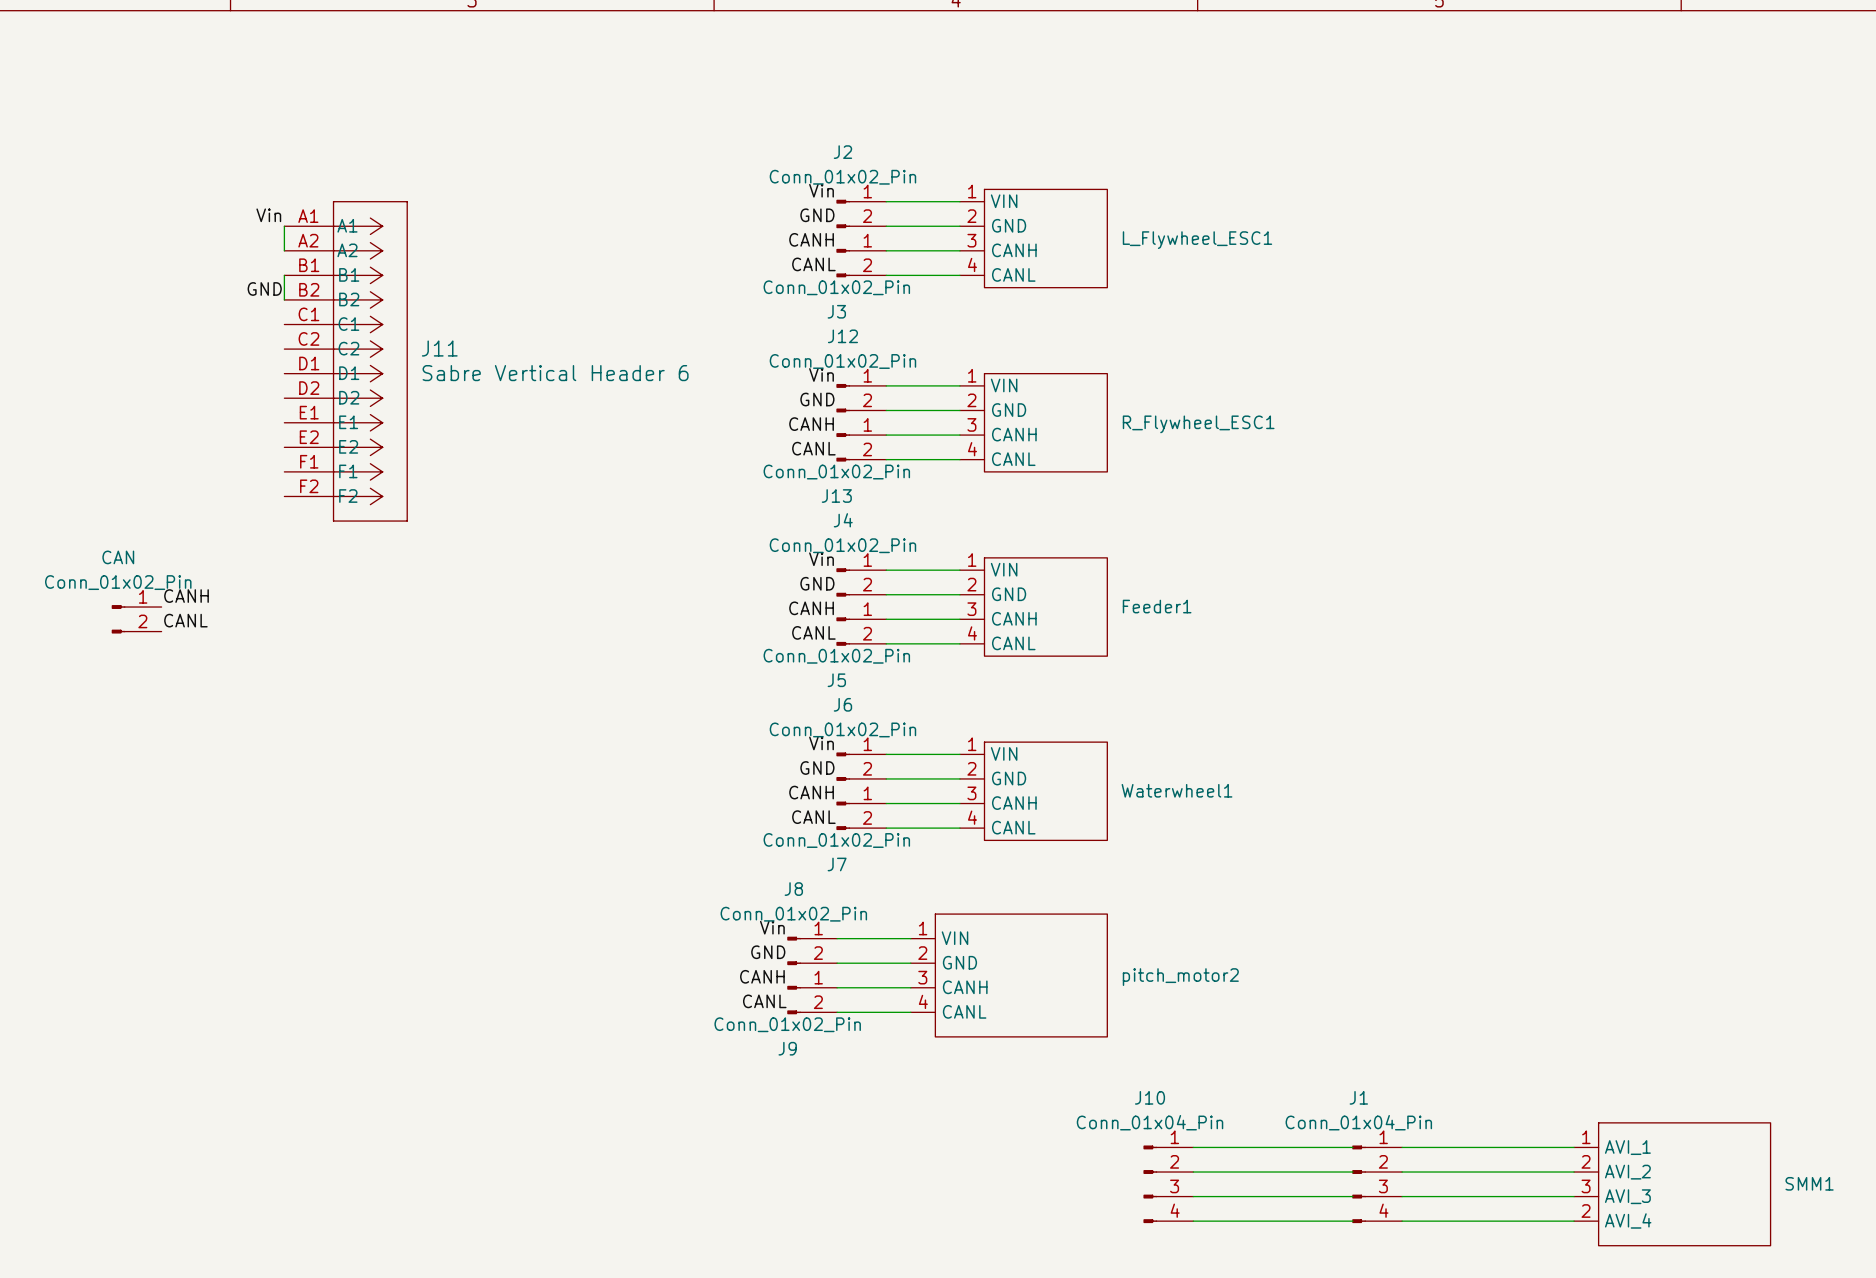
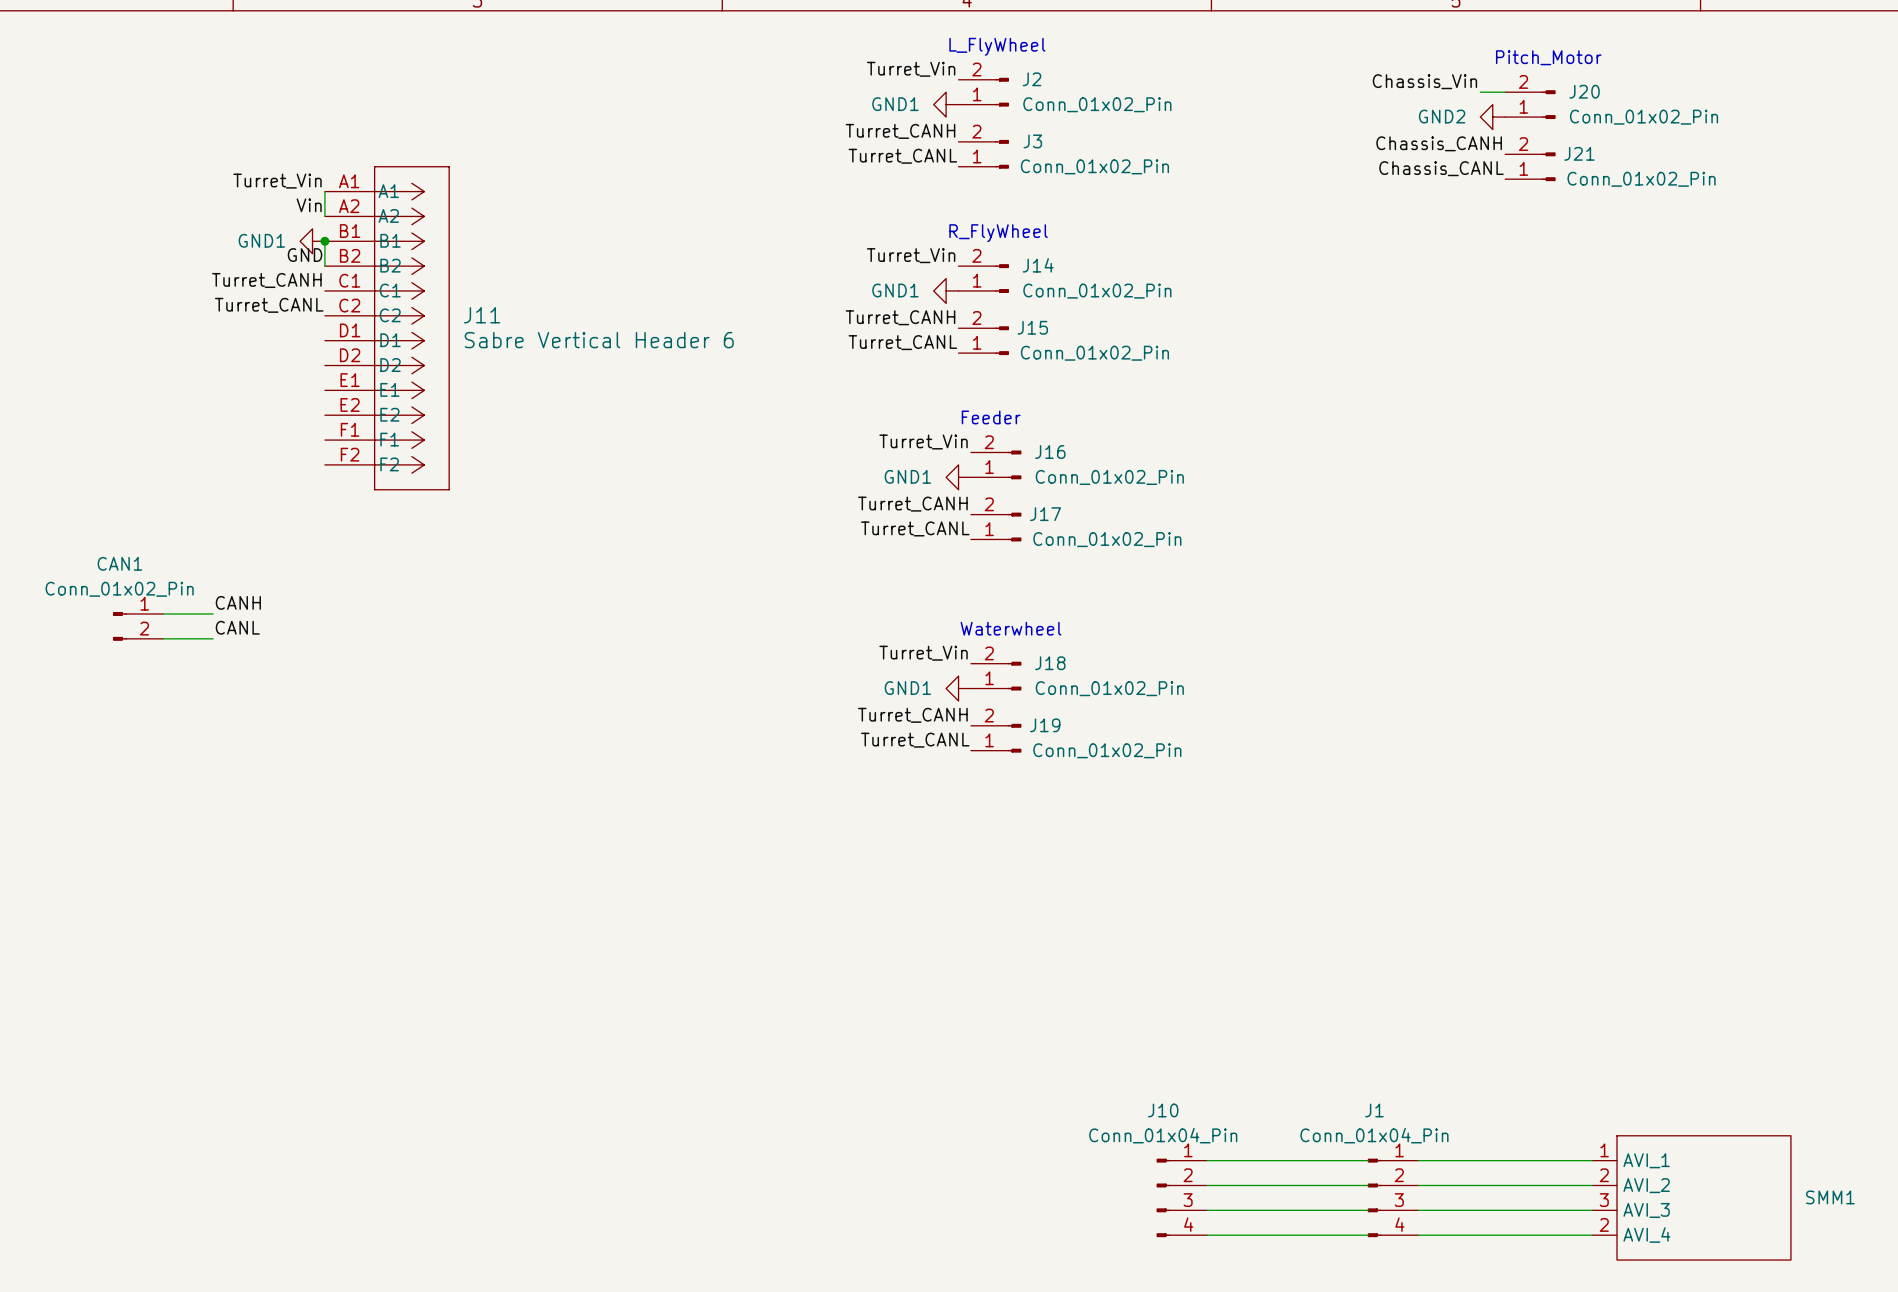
text: none -> L_FlyWheel (997, 46)
text: none -> Pitch_Motor (1548, 57)
label: none -> Turret_Vin (911, 69)
label: none -> Chassis_Vin (1424, 81)
wire: none -> (1480, 92) (1505, 92)
power symbol: none -> GND1 (946, 104)
J20: none -> Conn_01x02_Pin (1530, 104)
power symbol: none -> GND2 (1492, 117)
label: none -> Turret_CANH (900, 131)
label: none -> Chassis_CANH (1439, 143)
J2 name position: J2 (842, 152) -> J2 (1032, 79)
label: none -> Turret_CANL (902, 156)
J21: none -> Conn_01x02_Pin (1530, 166)
label: none -> Chassis_CANL (1441, 168)
J2 value position: Conn_01x02_Pin (842, 177) -> Conn_01x02_Pin (1097, 104)
label: none -> Turret_Vin (277, 181)
label: Vin (821, 190) -> none
wire: (886, 201) (959, 201) -> none
J2 rotation: 0° (843, 213) -> 180° (1002, 92)
J2 position: (861, 213) -> (983, 92)
label position: Vin (268, 215) -> Vin (309, 205)
label: GND (817, 215) -> none
wire: (284, 226) (284, 250) -> (324, 191) (324, 216)
wire: (886, 226) (959, 226) -> none
text: none -> R_FlyWheel (998, 233)
power symbol: none -> GND1 (312, 241)
junction: none -> (324, 241)
L_Flywheel_ESC1: (1033, 238) -> none
label: CANH (811, 239) -> none
wire: (886, 250) (959, 250) -> none
label: none -> Turret_Vin (911, 255)
J3 rotation: 0° (843, 263) -> 180° (1002, 154)
J3 position: (861, 263) -> (983, 154)
label: CANL (813, 264) -> none
wire: (284, 275) (284, 299) -> (324, 241) (324, 266)
wire: (886, 275) (959, 275) -> none
J14: none -> Conn_01x02_Pin (983, 278)
label: none -> Turret_CANH (266, 280)
J3 value position: Conn_01x02_Pin (836, 287) -> Conn_01x02_Pin (1094, 166)
power symbol: none -> GND1 (946, 290)
label position: GND (264, 288) -> GND (305, 255)
label: none -> Turret_CANL (269, 305)
J3 name position: J3 (836, 311) -> J3 (1032, 141)
label: none -> Turret_CANH (900, 317)
J15: none -> Conn_01x02_Pin (983, 340)
label: none -> Turret_CANL (902, 342)
J11 position: (346, 361) -> (387, 328)
label: Vin (821, 374) -> none
wire: (886, 385) (959, 385) -> none
J12: Conn_01x02_Pin (861, 398) -> none
label: GND (817, 399) -> none
wire: (886, 410) (959, 410) -> none
text: none -> Feeder (991, 417)
R_Flywheel_ESC1: (1033, 422) -> none
label: CANH (811, 424) -> none
wire: (886, 435) (959, 435) -> none
label: none -> Turret_Vin (923, 441)
J13: Conn_01x02_Pin (861, 447) -> none
label: CANL (813, 448) -> none
wire: (886, 459) (959, 459) -> none
J16: none -> Conn_01x02_Pin (996, 464)
power symbol: none -> GND1 (958, 477)
label: none -> Turret_CANH (912, 504)
J17: none -> Conn_01x02_Pin (996, 527)
label: none -> Turret_CANL (915, 528)
CAN name: CAN (118, 557) -> CAN1 (119, 563)
label: Vin (821, 559) -> none
wire: (886, 570) (959, 570) -> none
J4: Conn_01x02_Pin (861, 582) -> none
label: GND (817, 583) -> none
wire: (886, 594) (959, 594) -> none
label position: CANH (186, 596) -> CANH (238, 602)
wire: none -> (163, 613) (213, 613)
Feeder1: (1033, 607) -> none
label: CANH (811, 608) -> none
wire: (886, 619) (959, 619) -> none
label position: CANL (185, 620) -> CANL (237, 627)
text: none -> Waterwheel (1011, 628)
wire: none -> (163, 638) (213, 638)
J5: Conn_01x02_Pin (861, 631) -> none
label: CANL (813, 632) -> none
wire: (886, 643) (959, 643) -> none
label: none -> Turret_Vin (923, 653)
J18: none -> Conn_01x02_Pin (996, 676)
power symbol: none -> GND1 (958, 688)
label: none -> Turret_CANH (912, 715)
J19: none -> Conn_01x02_Pin (996, 738)
label: none -> Turret_CANL (915, 740)
label: Vin (821, 743) -> none
wire: (886, 754) (959, 754) -> none
J6: Conn_01x02_Pin (861, 766) -> none
label: GND (817, 768) -> none
wire: (886, 778) (959, 778) -> none
Waterwheel1: (1033, 791) -> none
label: CANH (811, 792) -> none
wire: (886, 803) (959, 803) -> none
J7: Conn_01x02_Pin (861, 815) -> none
label: CANL (813, 817) -> none
wire: (886, 828) (959, 828) -> none
label: Vin (772, 927) -> none
wire: (837, 938) (910, 938) -> none
J8: Conn_01x02_Pin (812, 950) -> none
label: GND (768, 952) -> none
wire: (837, 963) (910, 963) -> none
pitch_motor2: (1009, 975) -> none
label: CANH (762, 976) -> none
wire: (837, 987) (910, 987) -> none
J9: Conn_01x02_Pin (812, 1000) -> none
label: CANL (764, 1001) -> none
wire: (837, 1012) (910, 1012) -> none

